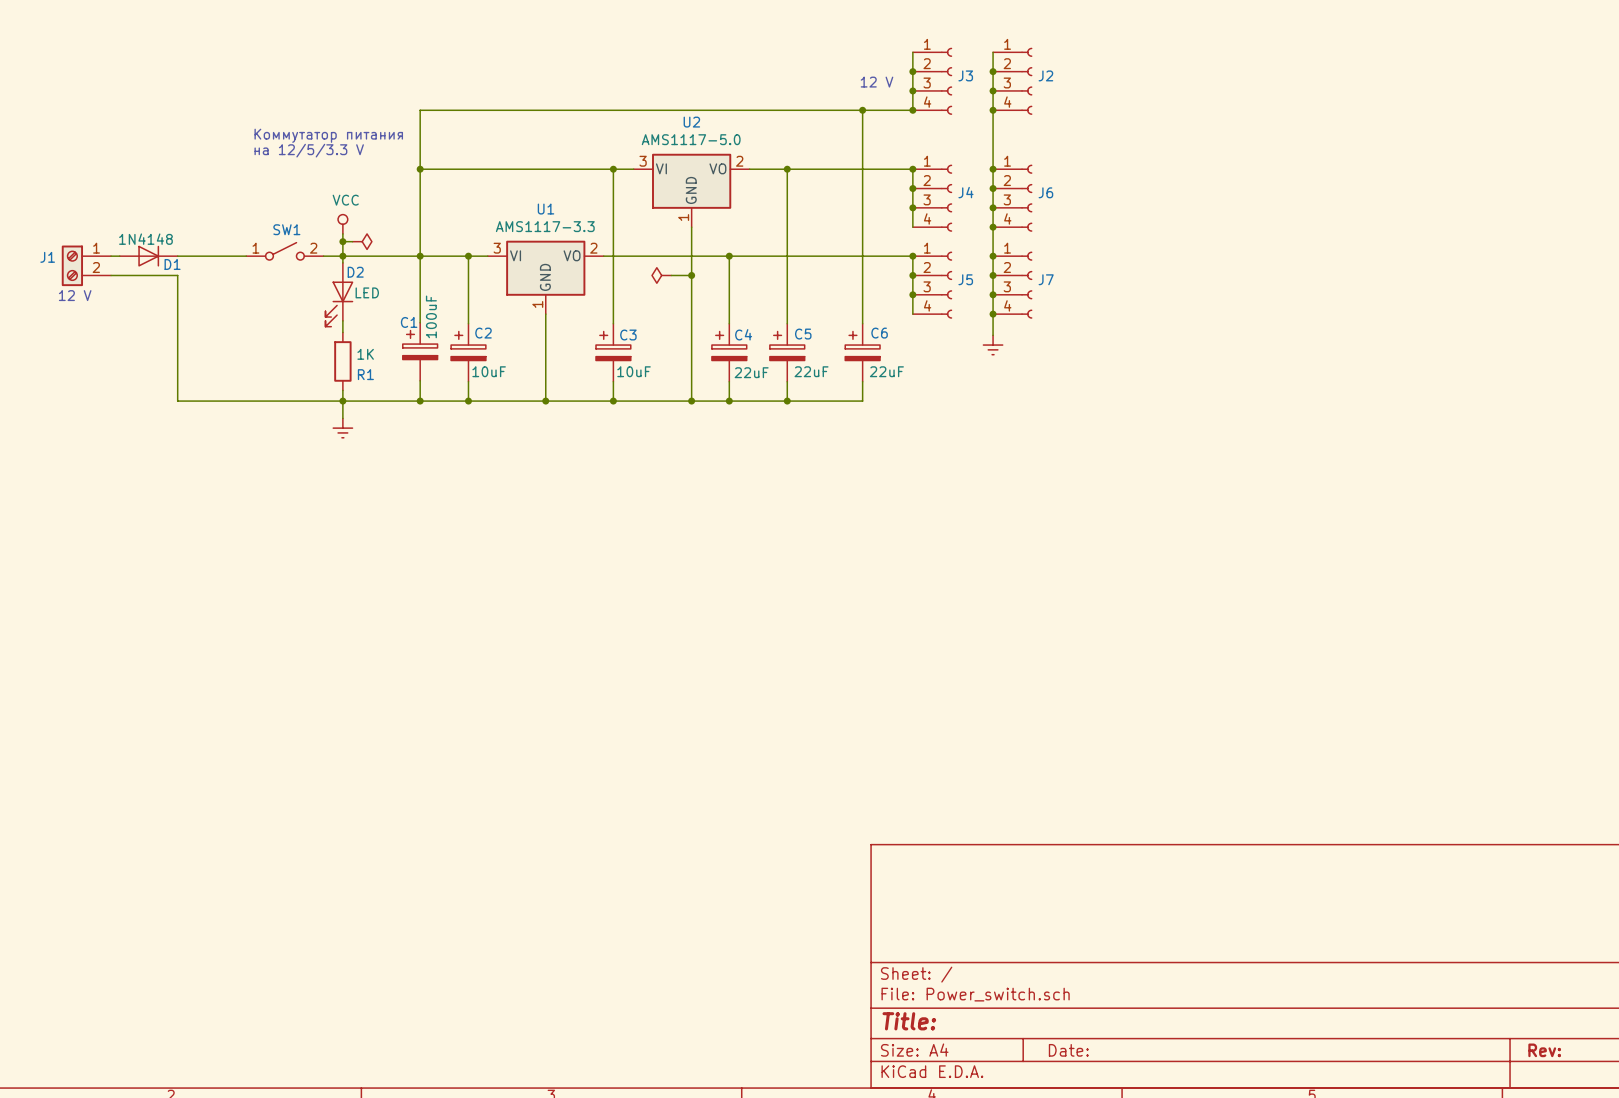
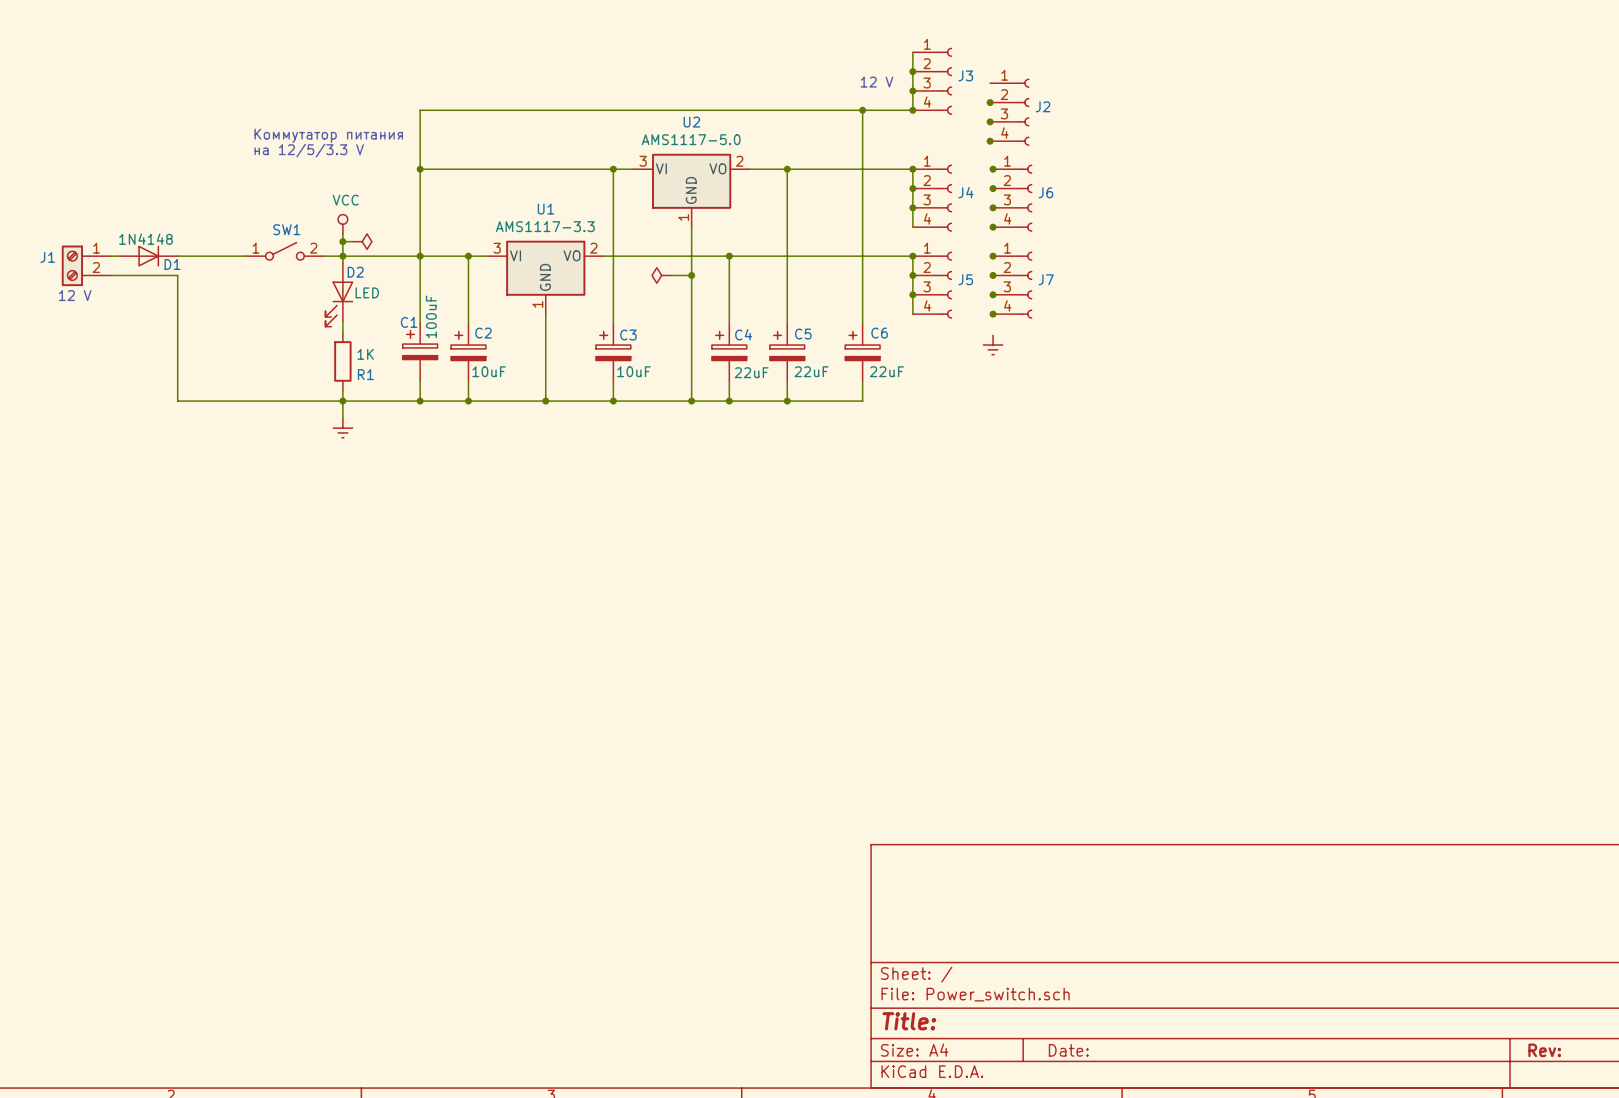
wire: (993, 52) (993, 335) -> none
junction: (993, 71) -> none
J2 position: (1012, 81) -> (1009, 112)
junction: (993, 90) -> none
junction: none -> (990, 102)
junction: (993, 110) -> none
junction: none -> (990, 121)
junction: none -> (990, 141)

